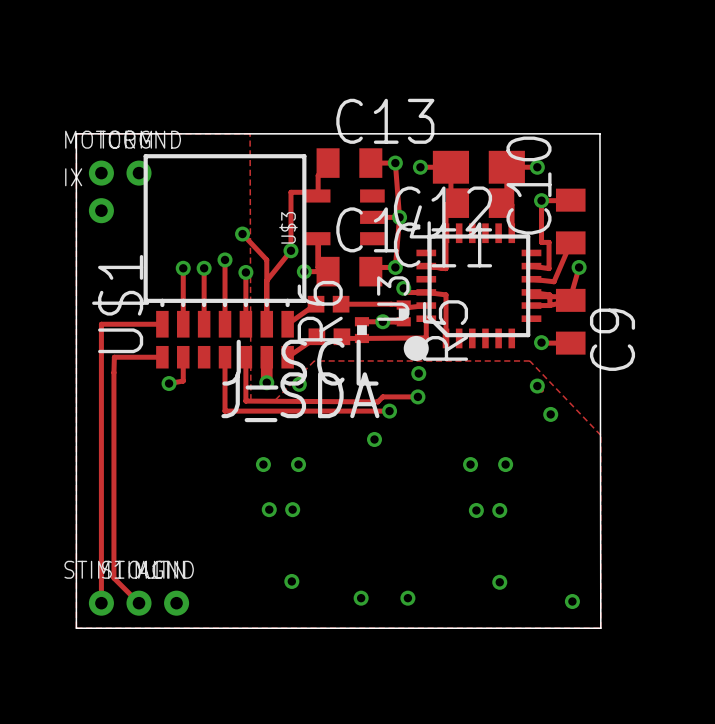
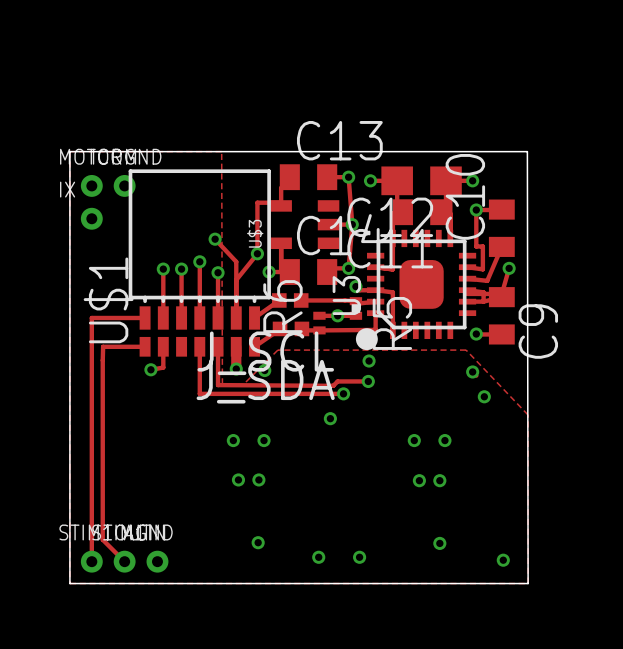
U3 footprint: [403, 223, 542, 361] -> [355, 229, 477, 351]
R6 footprint: [354, 317, 370, 344] -> [313, 311, 326, 335]

